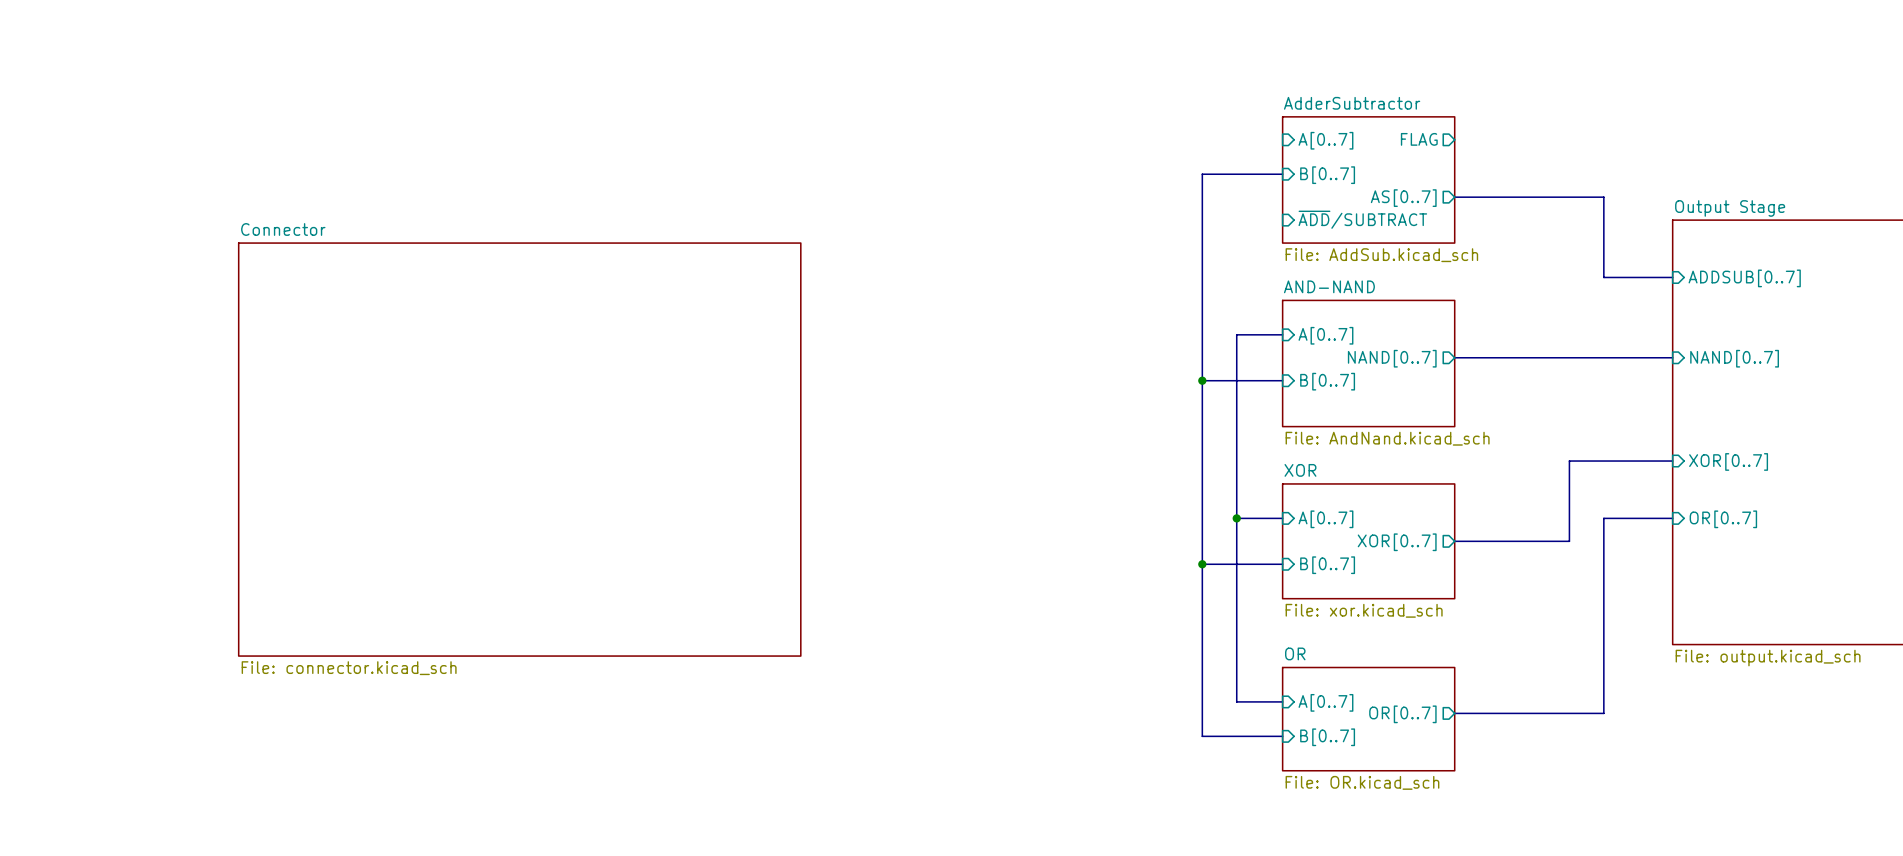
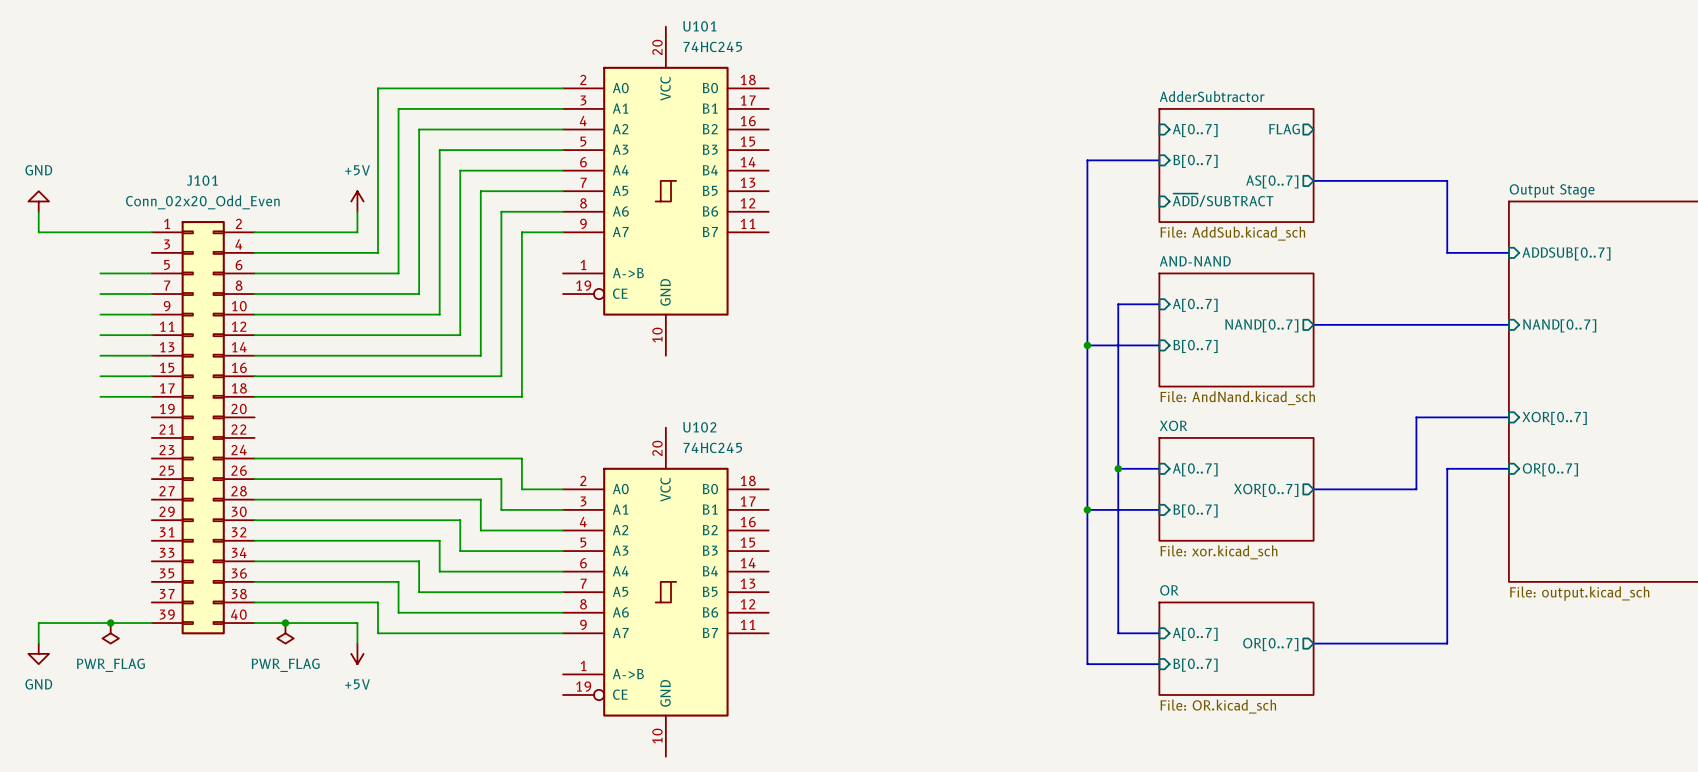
wire: none -> (563, 88) (378, 88) (378, 252) (254, 252)
wire: none -> (563, 108) (398, 108) (398, 273) (254, 273)
wire: none -> (563, 129) (419, 129) (419, 294) (254, 294)
wire: none -> (563, 150) (439, 150) (439, 314) (254, 314)
wire: none -> (563, 170) (460, 170) (460, 335) (254, 335)
wire: none -> (563, 191) (480, 191) (480, 355) (254, 355)
U101: none -> 74HC245 (665, 191)
power symbol: none -> GND (38, 201)
power symbol: none -> +5V (357, 201)
wire: none -> (38, 211) (38, 232) (151, 232)
wire: none -> (357, 211) (357, 232) (254, 232)
wire: none -> (563, 211) (501, 211) (501, 376) (254, 376)
wire: none -> (563, 232) (521, 232) (521, 396) (254, 396)
wire: none -> (100, 273) (151, 273)
wire: none -> (100, 294) (151, 294)
wire: none -> (100, 314) (151, 314)
wire: none -> (100, 335) (151, 335)
wire: none -> (100, 355) (151, 355)
wire: none -> (100, 376) (151, 376)
wire: none -> (100, 396) (151, 396)
sheet Connector: File: connector.kicad_sch (519, 449) -> none
J101: none -> Conn_02x20_Odd_Even (203, 427)
wire: none -> (254, 458) (521, 458) (521, 489) (563, 489)
wire: none -> (254, 479) (501, 479) (501, 509) (563, 509)
wire: none -> (254, 499) (480, 499) (480, 530) (563, 530)
wire: none -> (254, 520) (460, 520) (460, 551) (563, 551)
wire: none -> (254, 540) (439, 540) (439, 571) (563, 571)
wire: none -> (254, 561) (419, 561) (419, 592) (563, 592)
wire: none -> (254, 581) (398, 581) (398, 612) (563, 612)
U102: none -> 74HC245 (665, 592)
wire: none -> (254, 602) (378, 602) (378, 633) (563, 633)
junction: none -> (110, 623)
wire: none -> (151, 623) (38, 623) (38, 643)
wire: none -> (254, 623) (357, 623) (357, 643)
junction: none -> (285, 623)
power symbol: none -> PWR_FLAG (110, 633)
power symbol: none -> PWR_FLAG (285, 633)
power symbol: none -> GND (38, 653)
power symbol: none -> +5V (357, 653)

